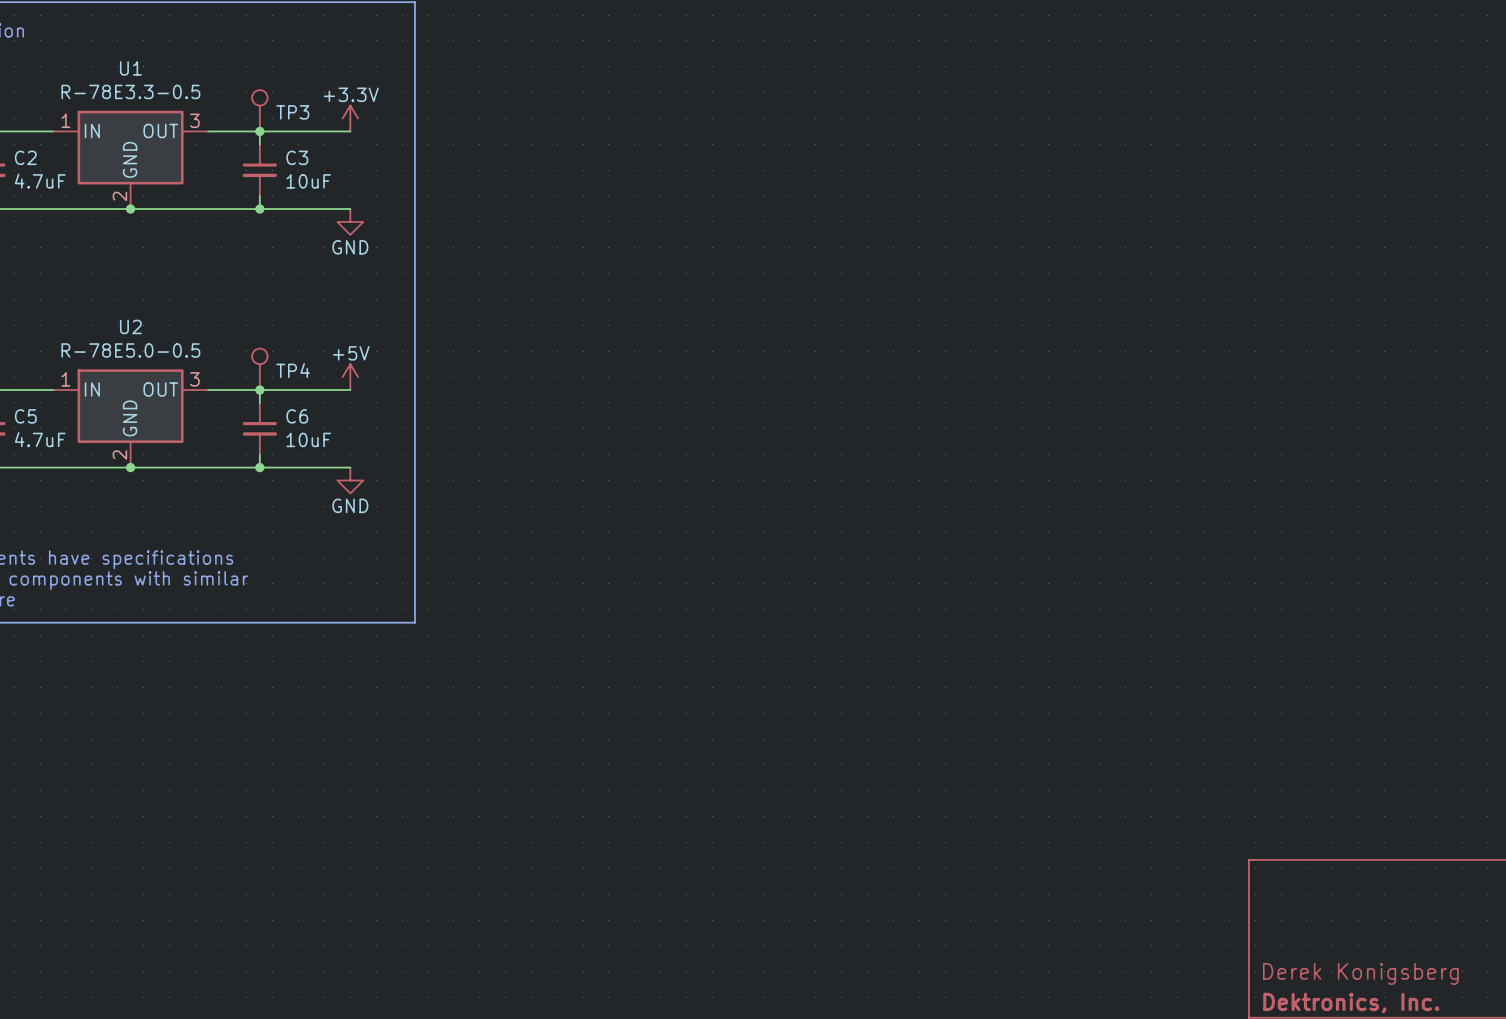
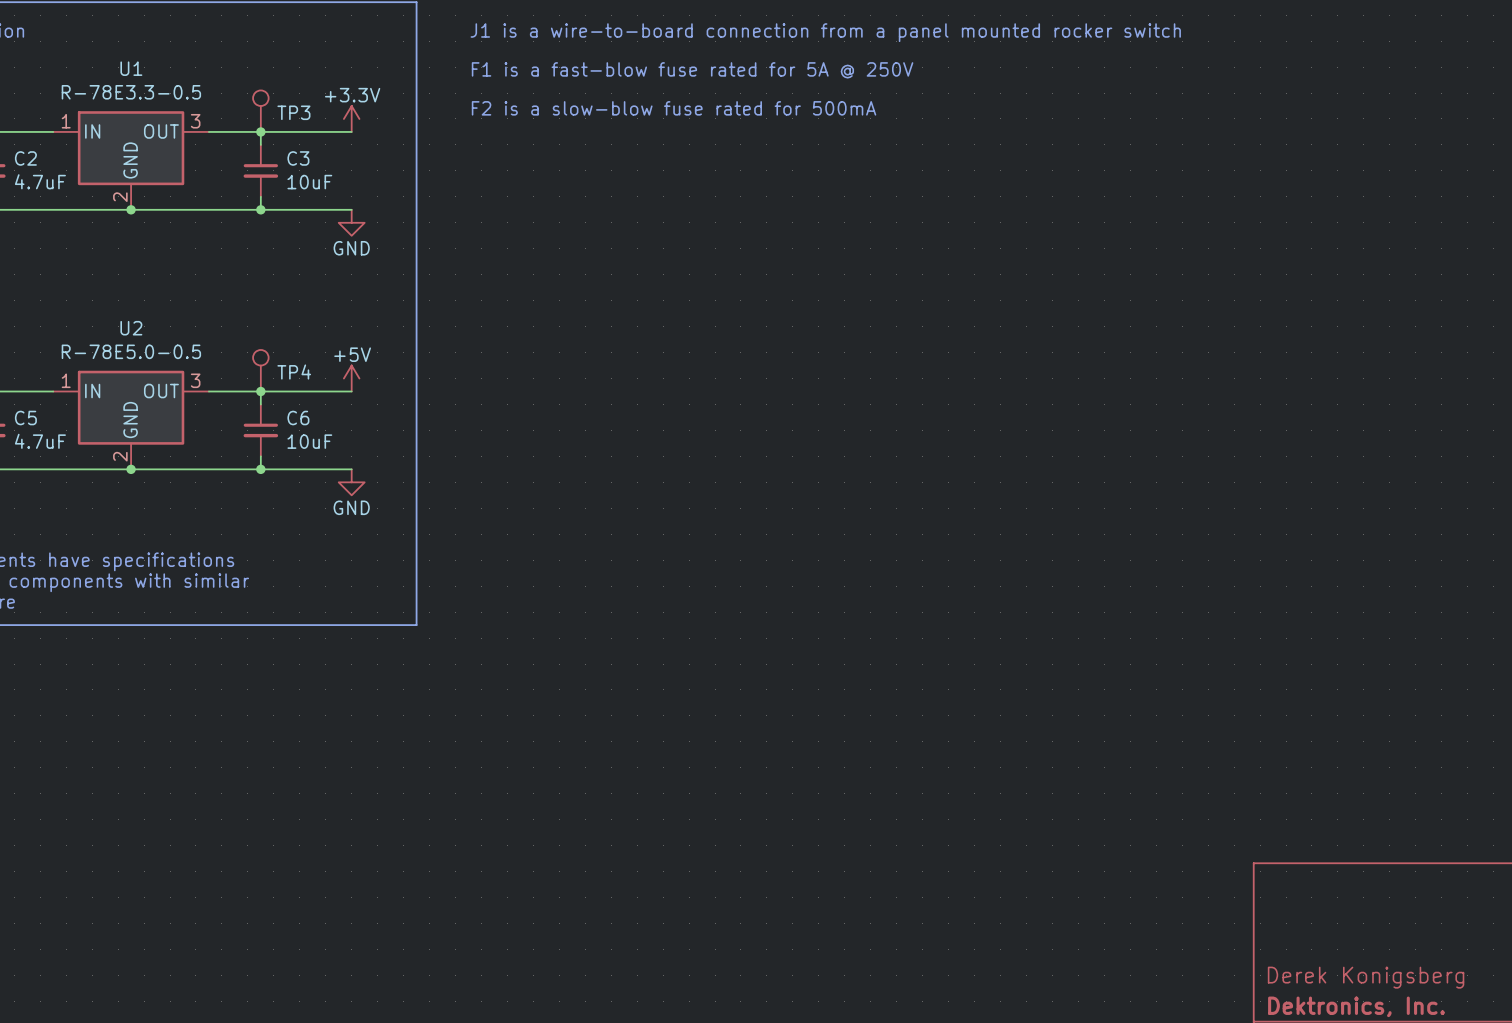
text: none -> J1 is a wire-to-board connection from a panel mounted rocker switch (825, 32)
text: none -> F1 is a fast-blow fuse rated for 5A @ 250V (692, 70)
text: none -> F2 is a slow-blow fuse rated for 500mA (674, 108)

